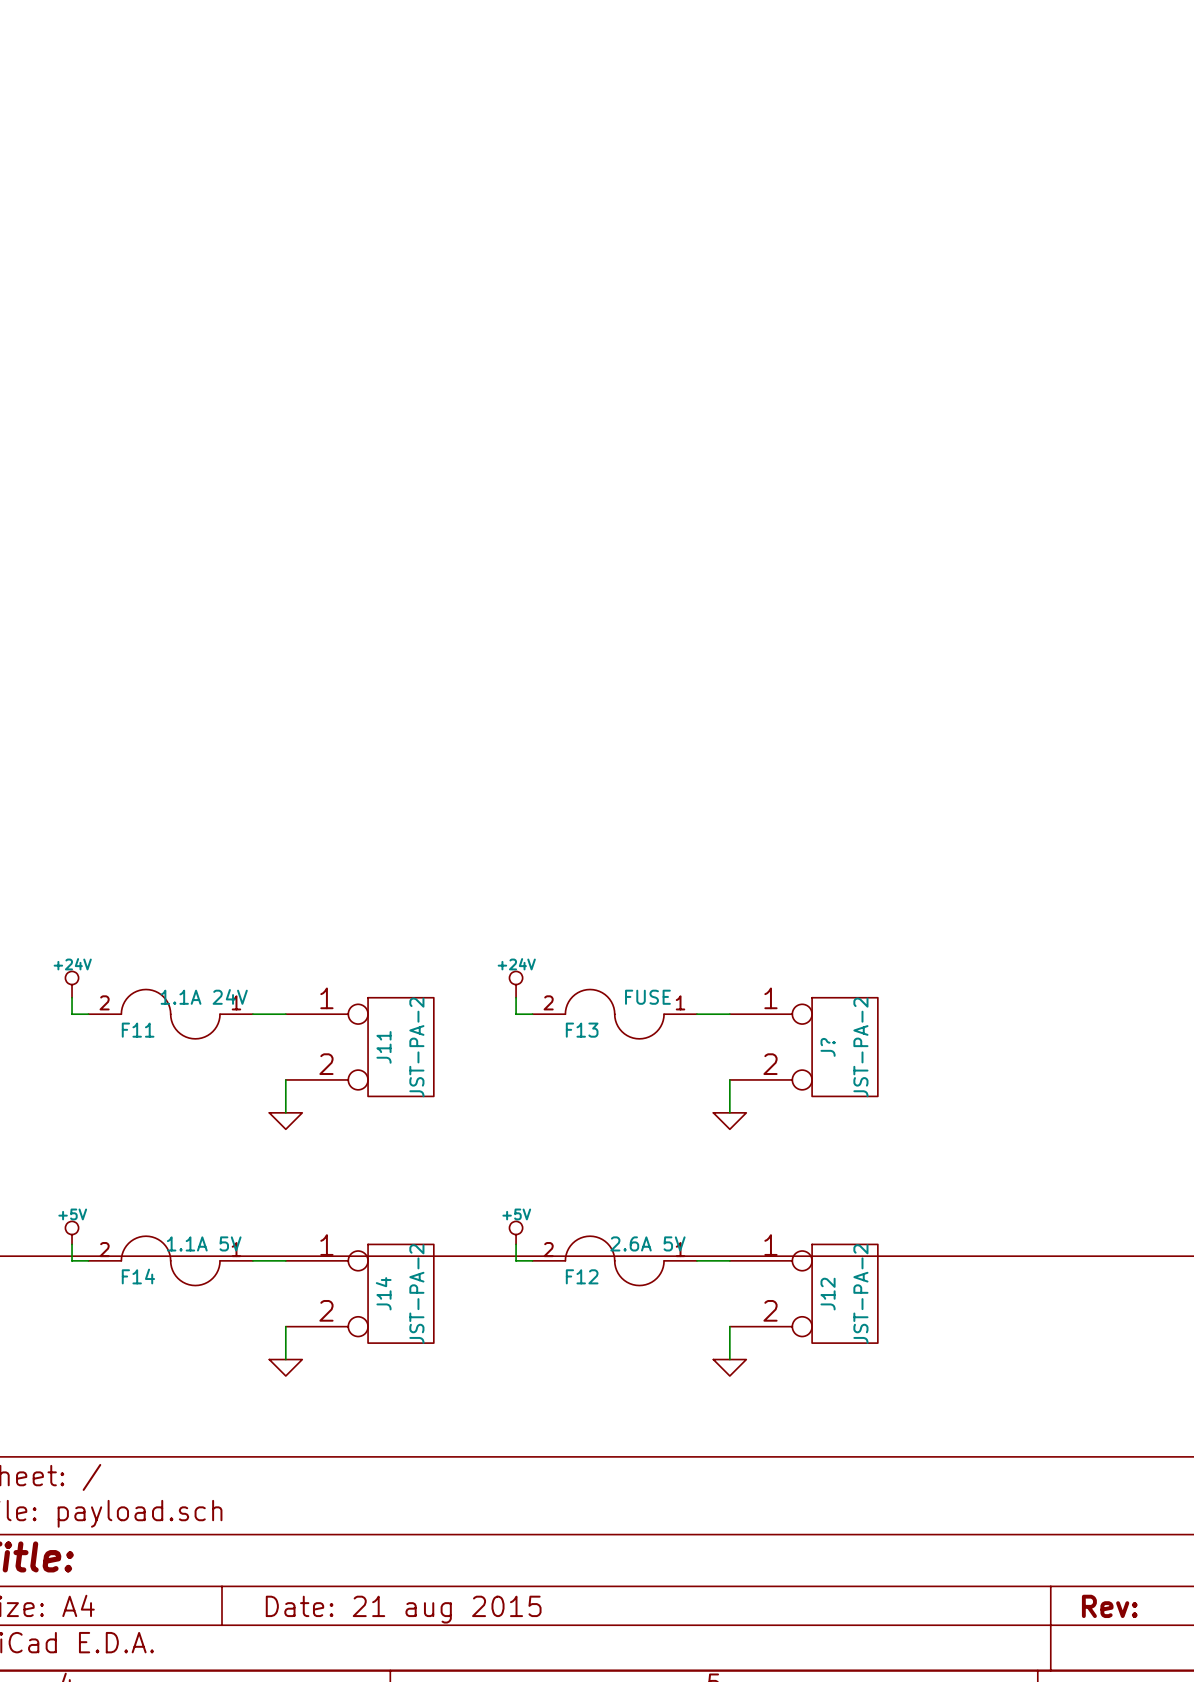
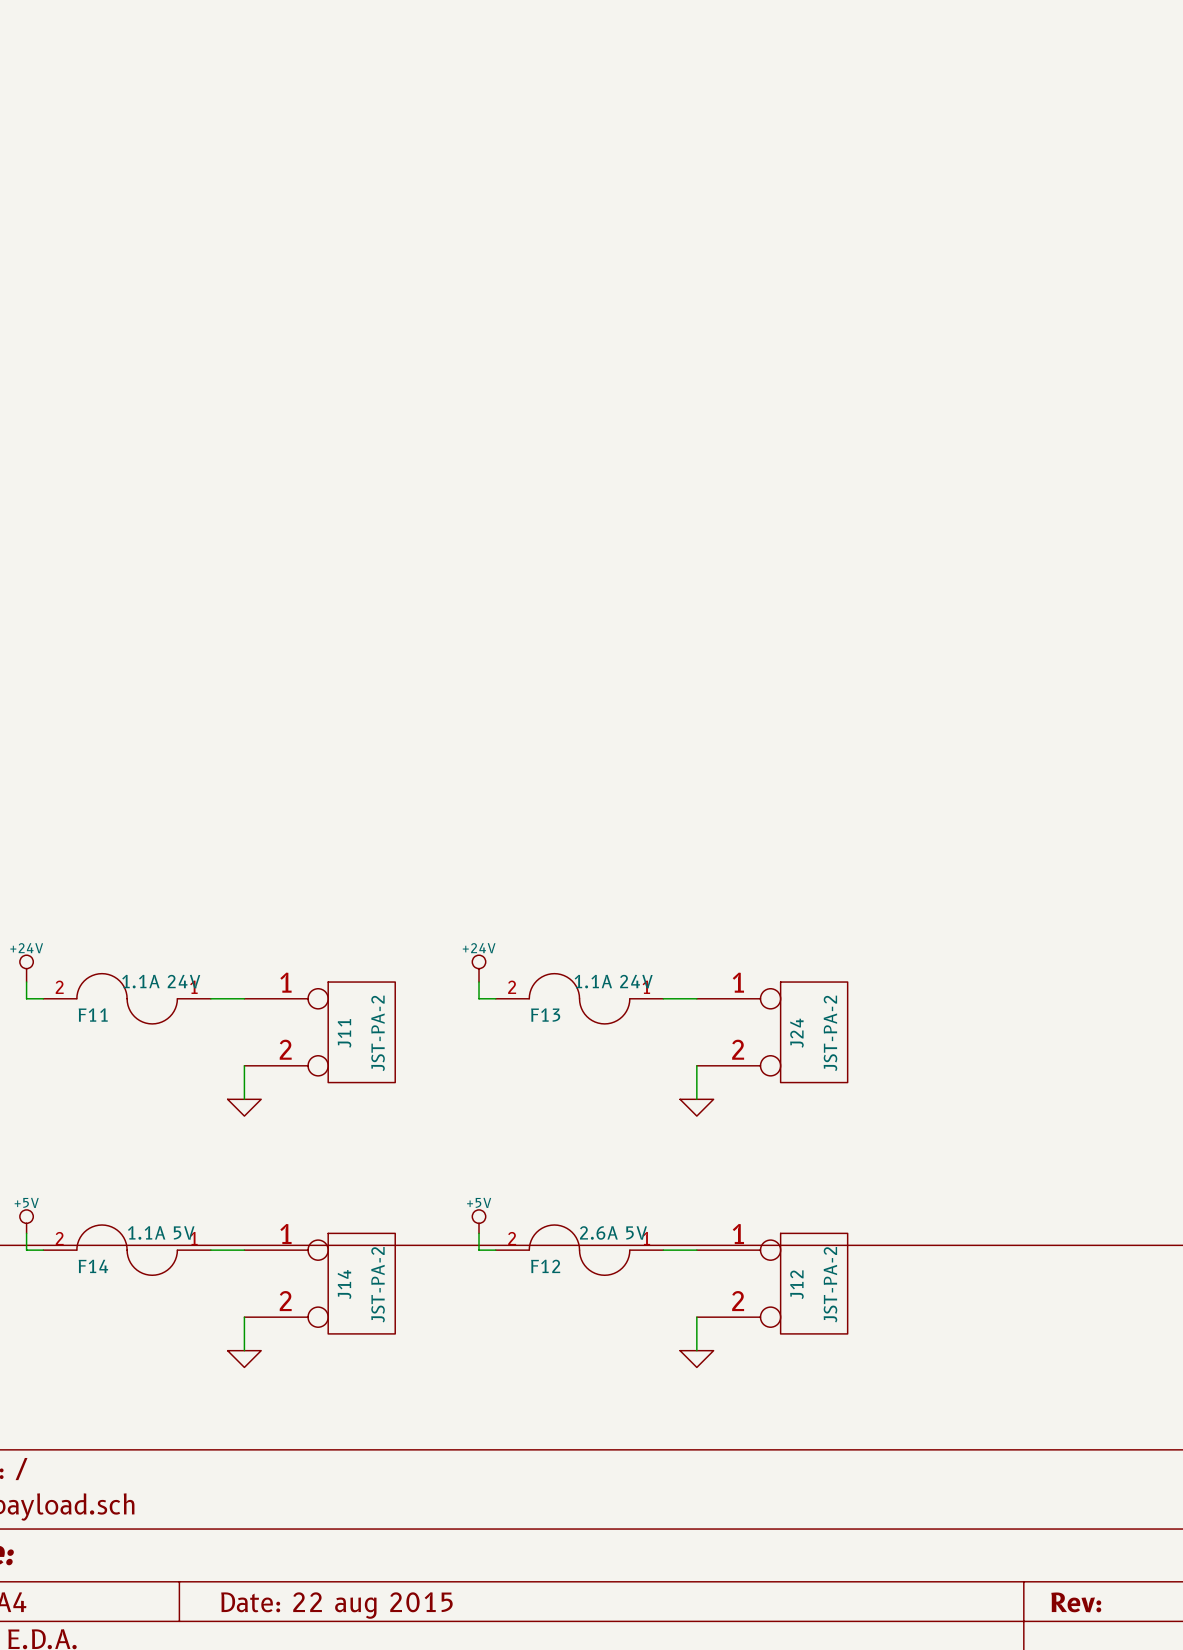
F13 value: FUSE (647, 997) -> 1.1A 24V (613, 981)
J? name: J? (828, 1047) -> J24 (796, 1033)
title block: Date: 21 aug 2015 (403, 1609) -> Date: 22 aug 2015 (336, 1605)

